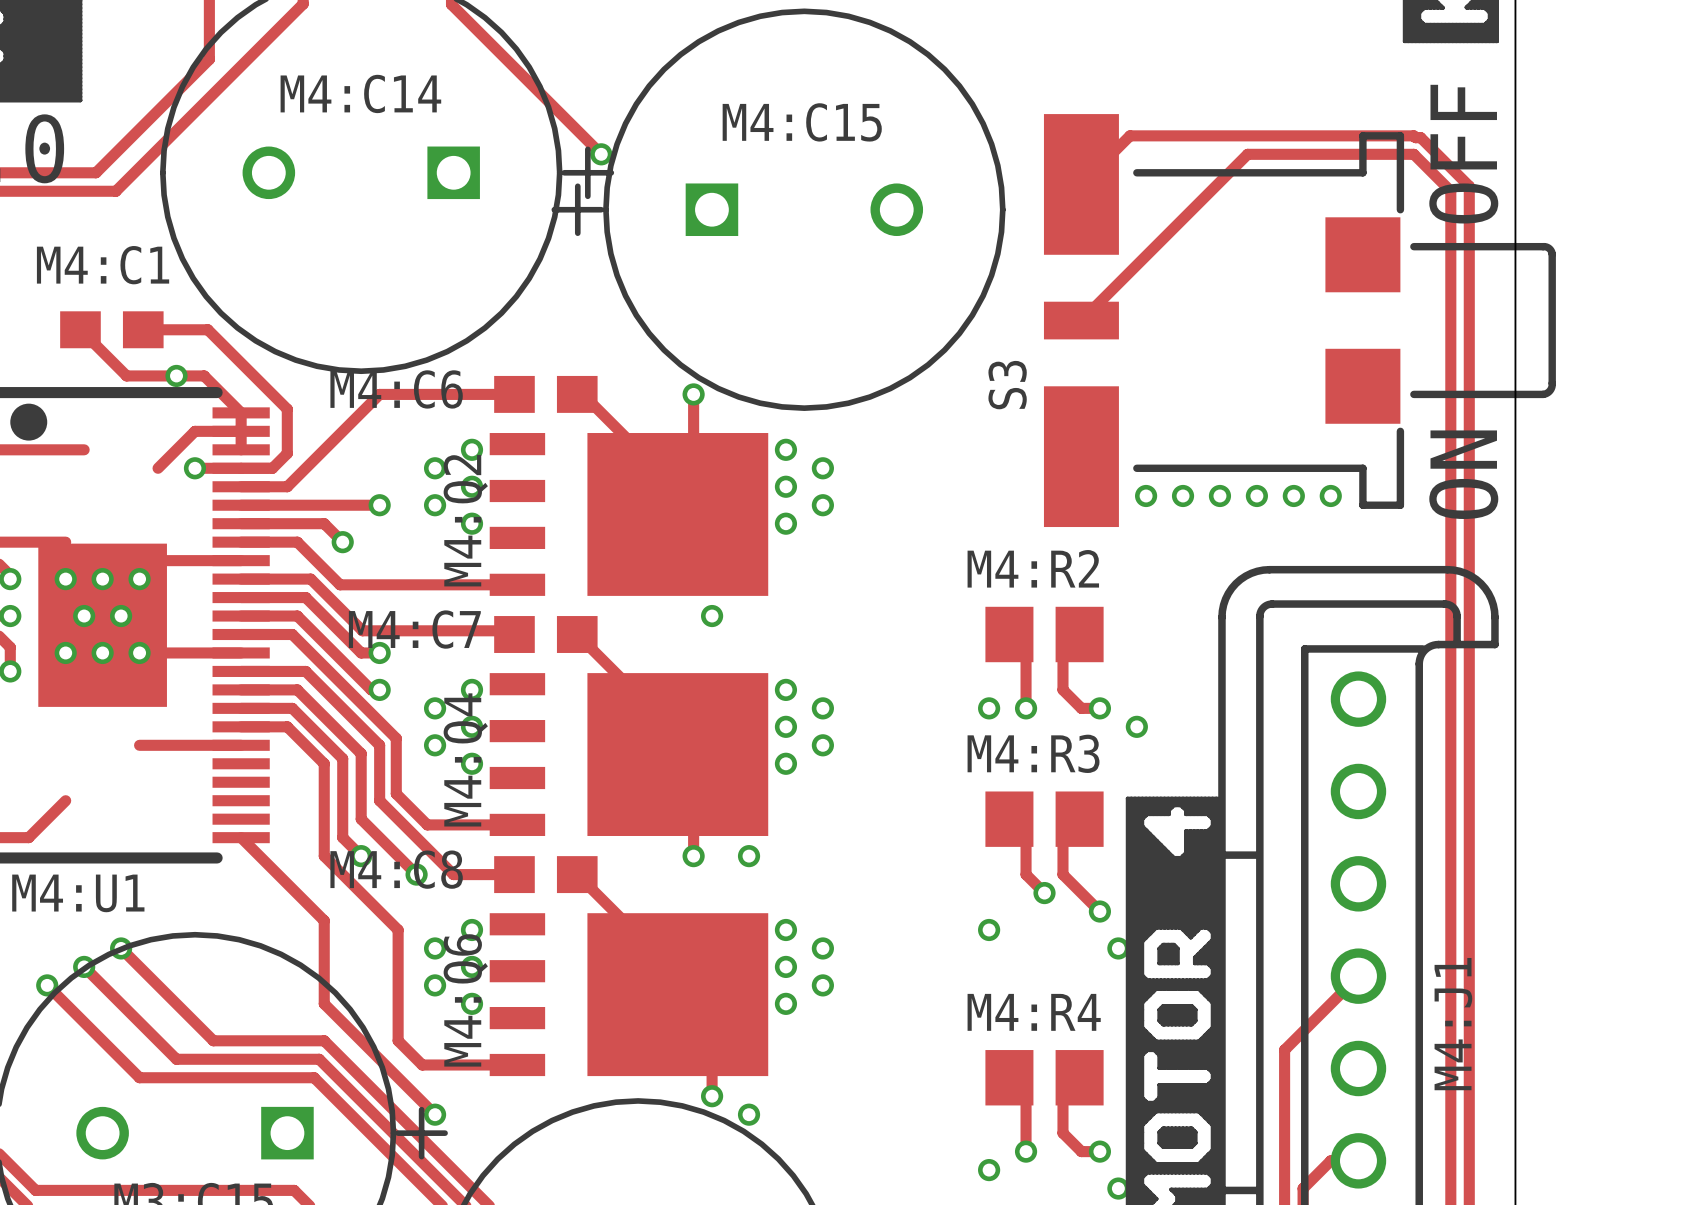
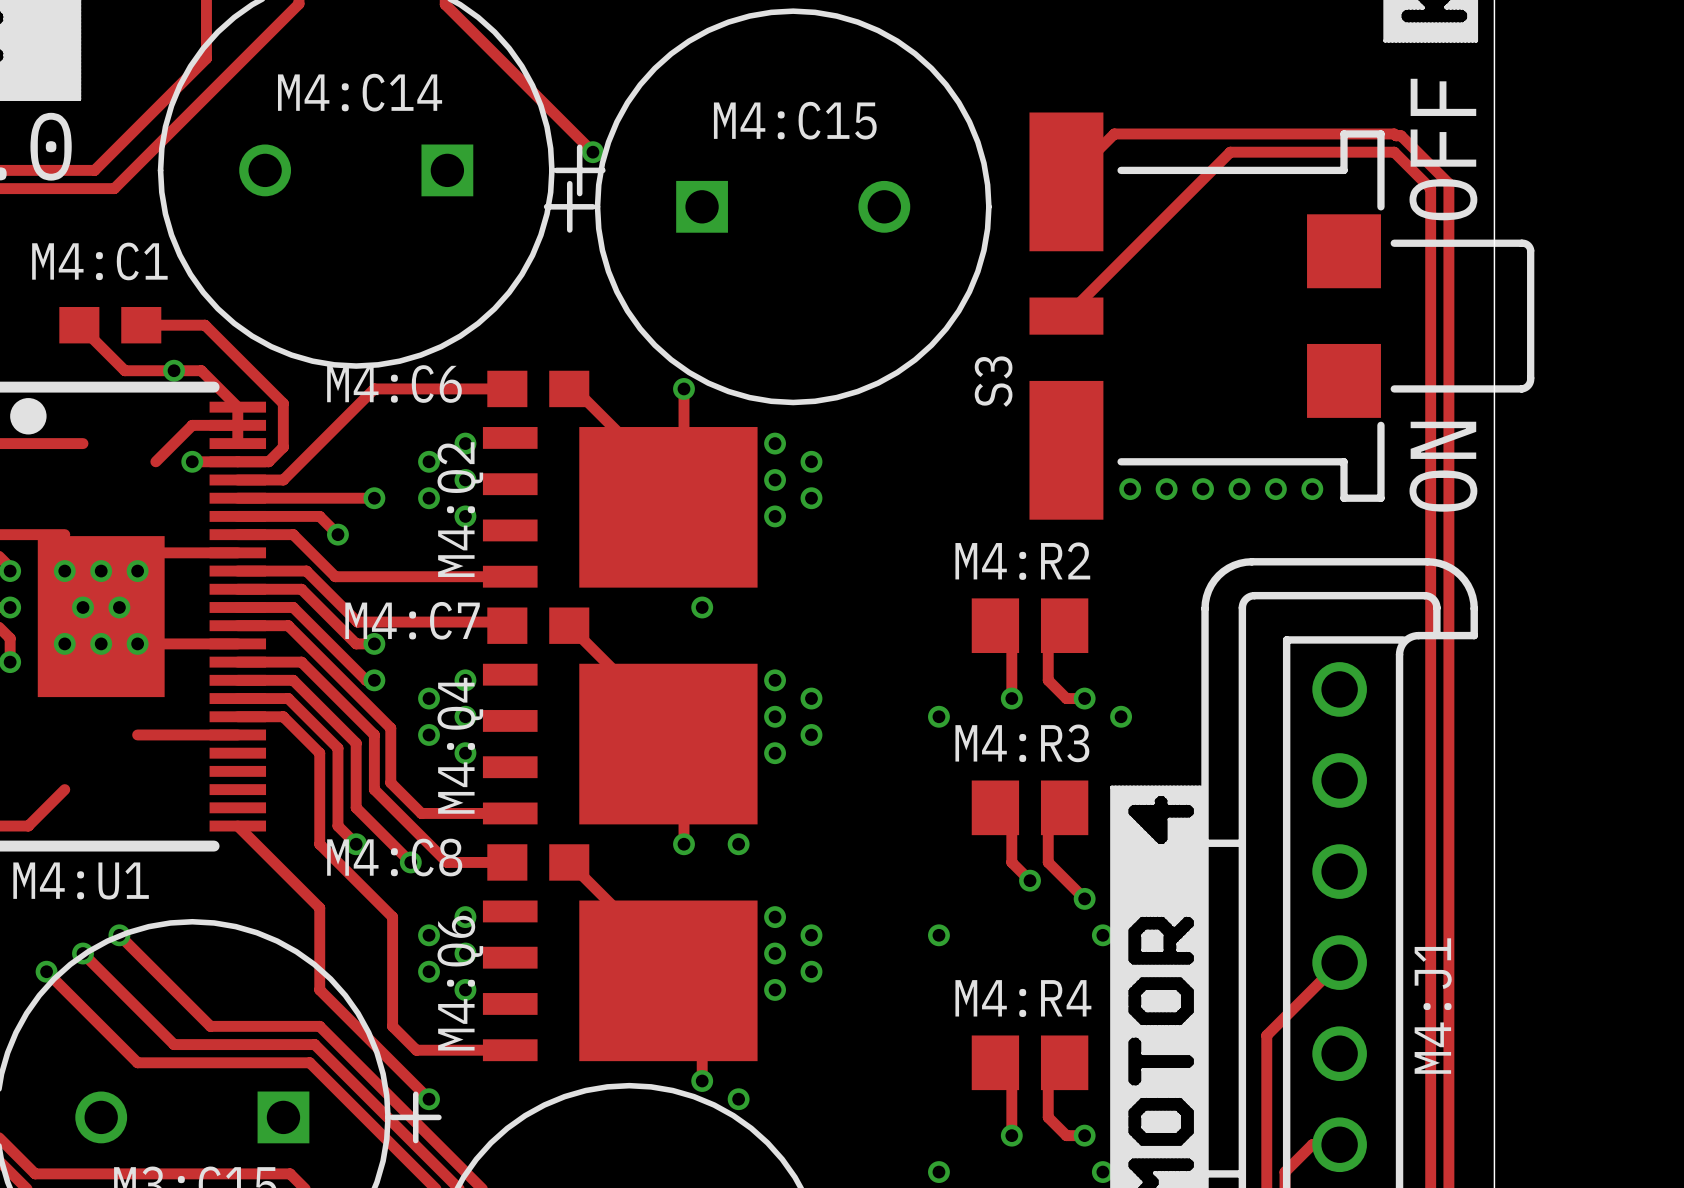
via position: (989, 708) -> (938, 716)
via position: (989, 929) -> (938, 935)
via position: (989, 1170) -> (938, 1172)

